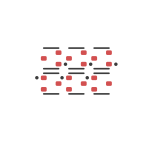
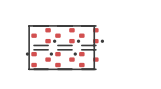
line: none -> (29, 25) (94, 25) (94, 69) (29, 69) (29, 25)

